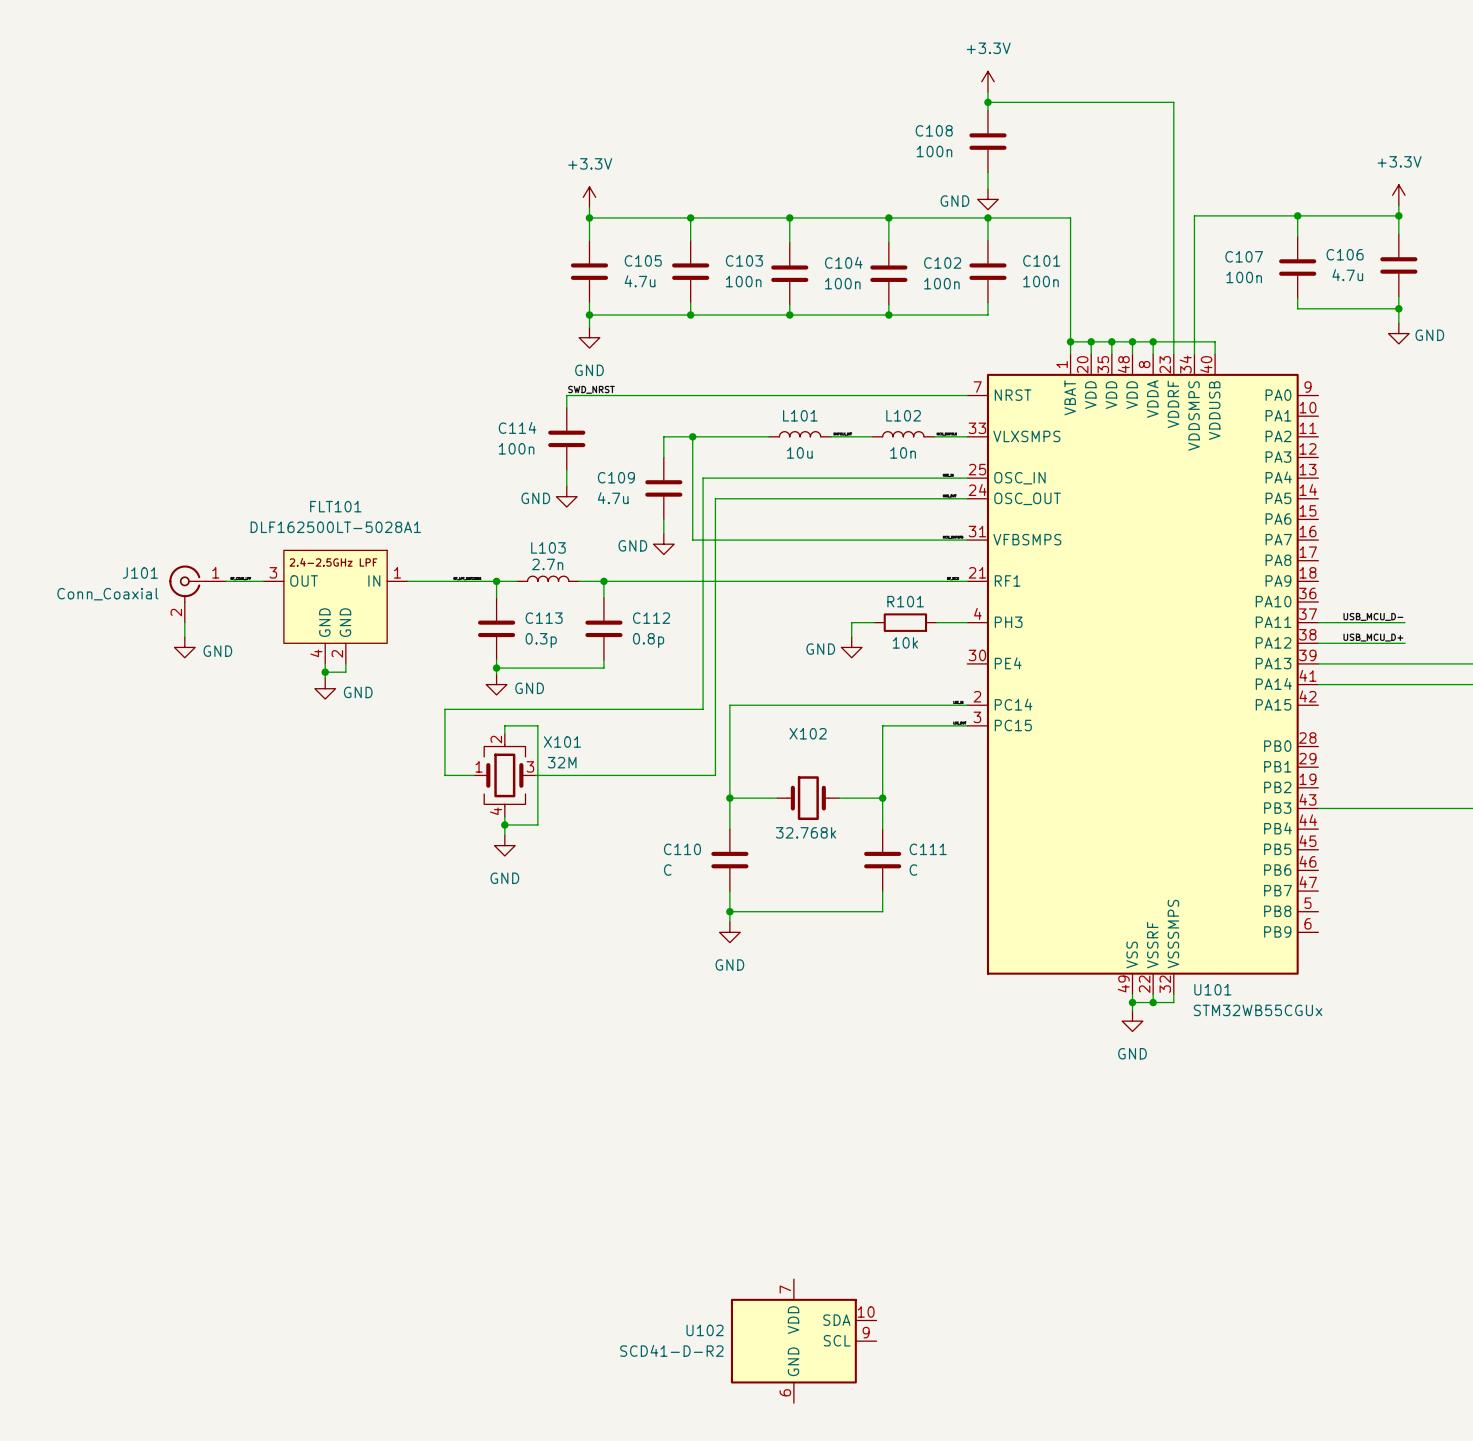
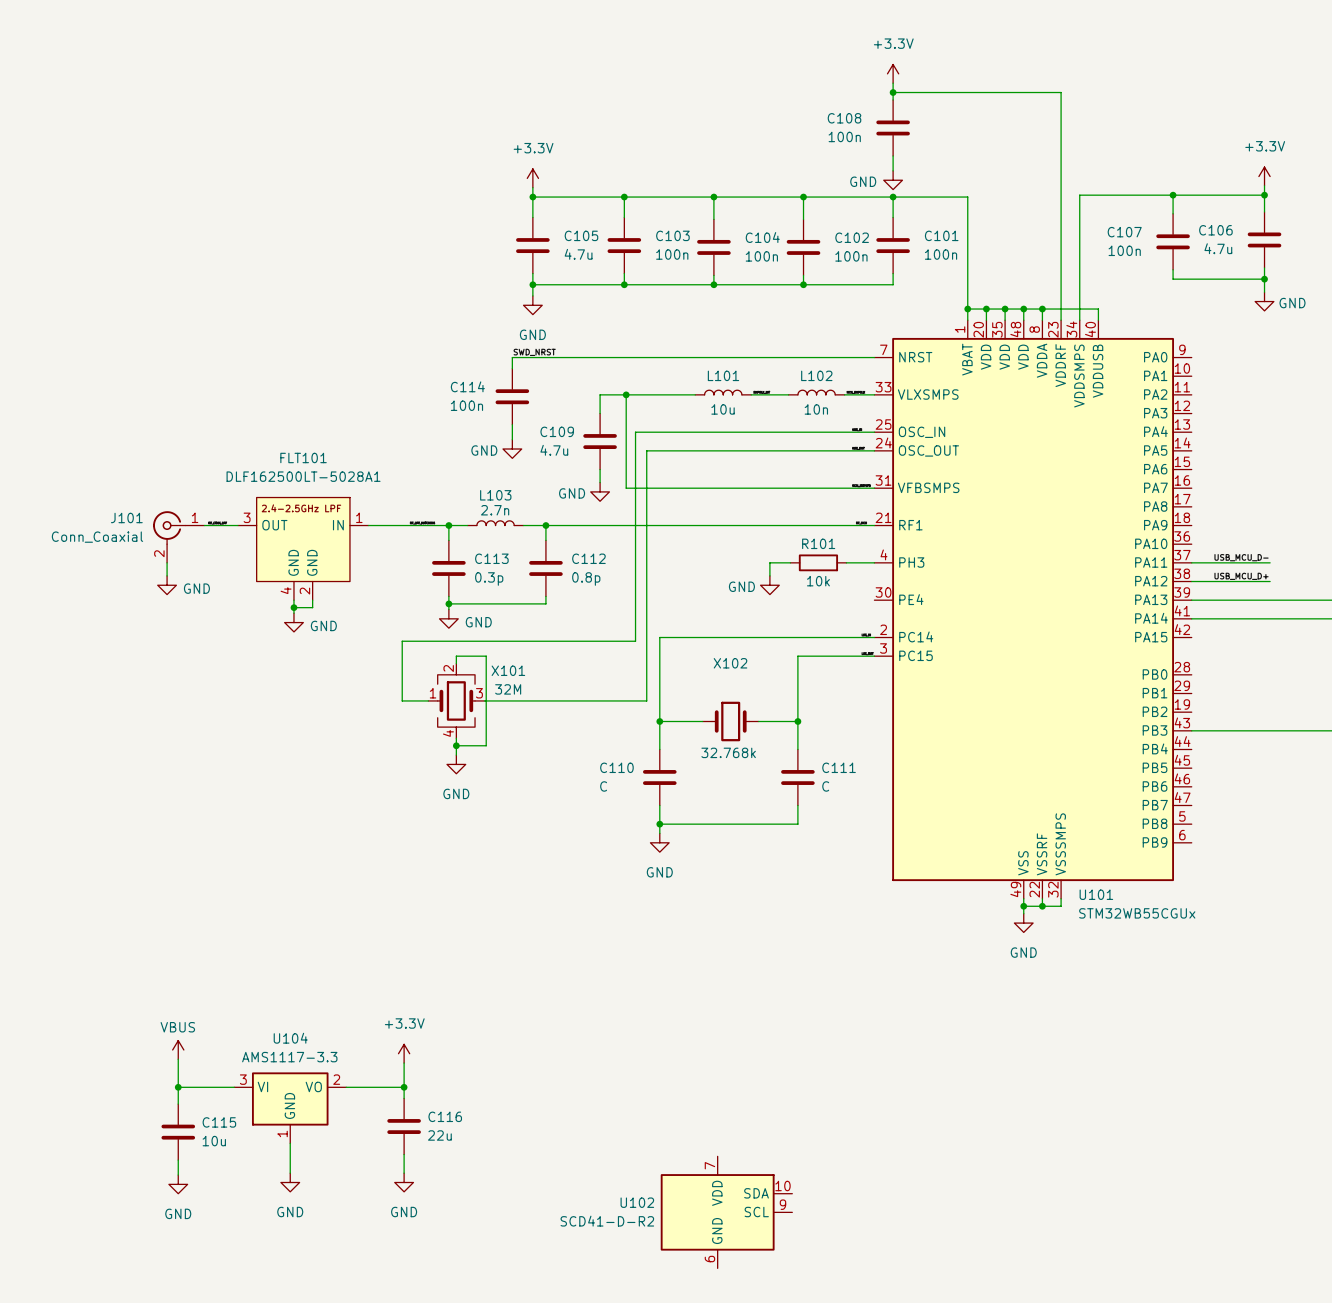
power symbol: none -> VBUS (178, 1049)
power symbol: none -> +3.3V (404, 1053)
wire: none -> (178, 1059) (178, 1104)
wire: none -> (404, 1063) (404, 1098)
wire: none -> (178, 1087) (234, 1087)
junction: none -> (178, 1087)
wire: none -> (346, 1087) (404, 1087)
junction: none -> (404, 1087)
U104: none -> AMS1117-3.3 (290, 1107)
C116: none -> 22u (404, 1126)
C115: none -> 10u (178, 1132)
wire: none -> (290, 1143) (290, 1173)
wire: none -> (404, 1154) (404, 1173)
wire: none -> (178, 1160) (178, 1175)
power symbol: none -> GND (290, 1182)
power symbol: none -> GND (404, 1182)
power symbol: none -> GND (178, 1184)

